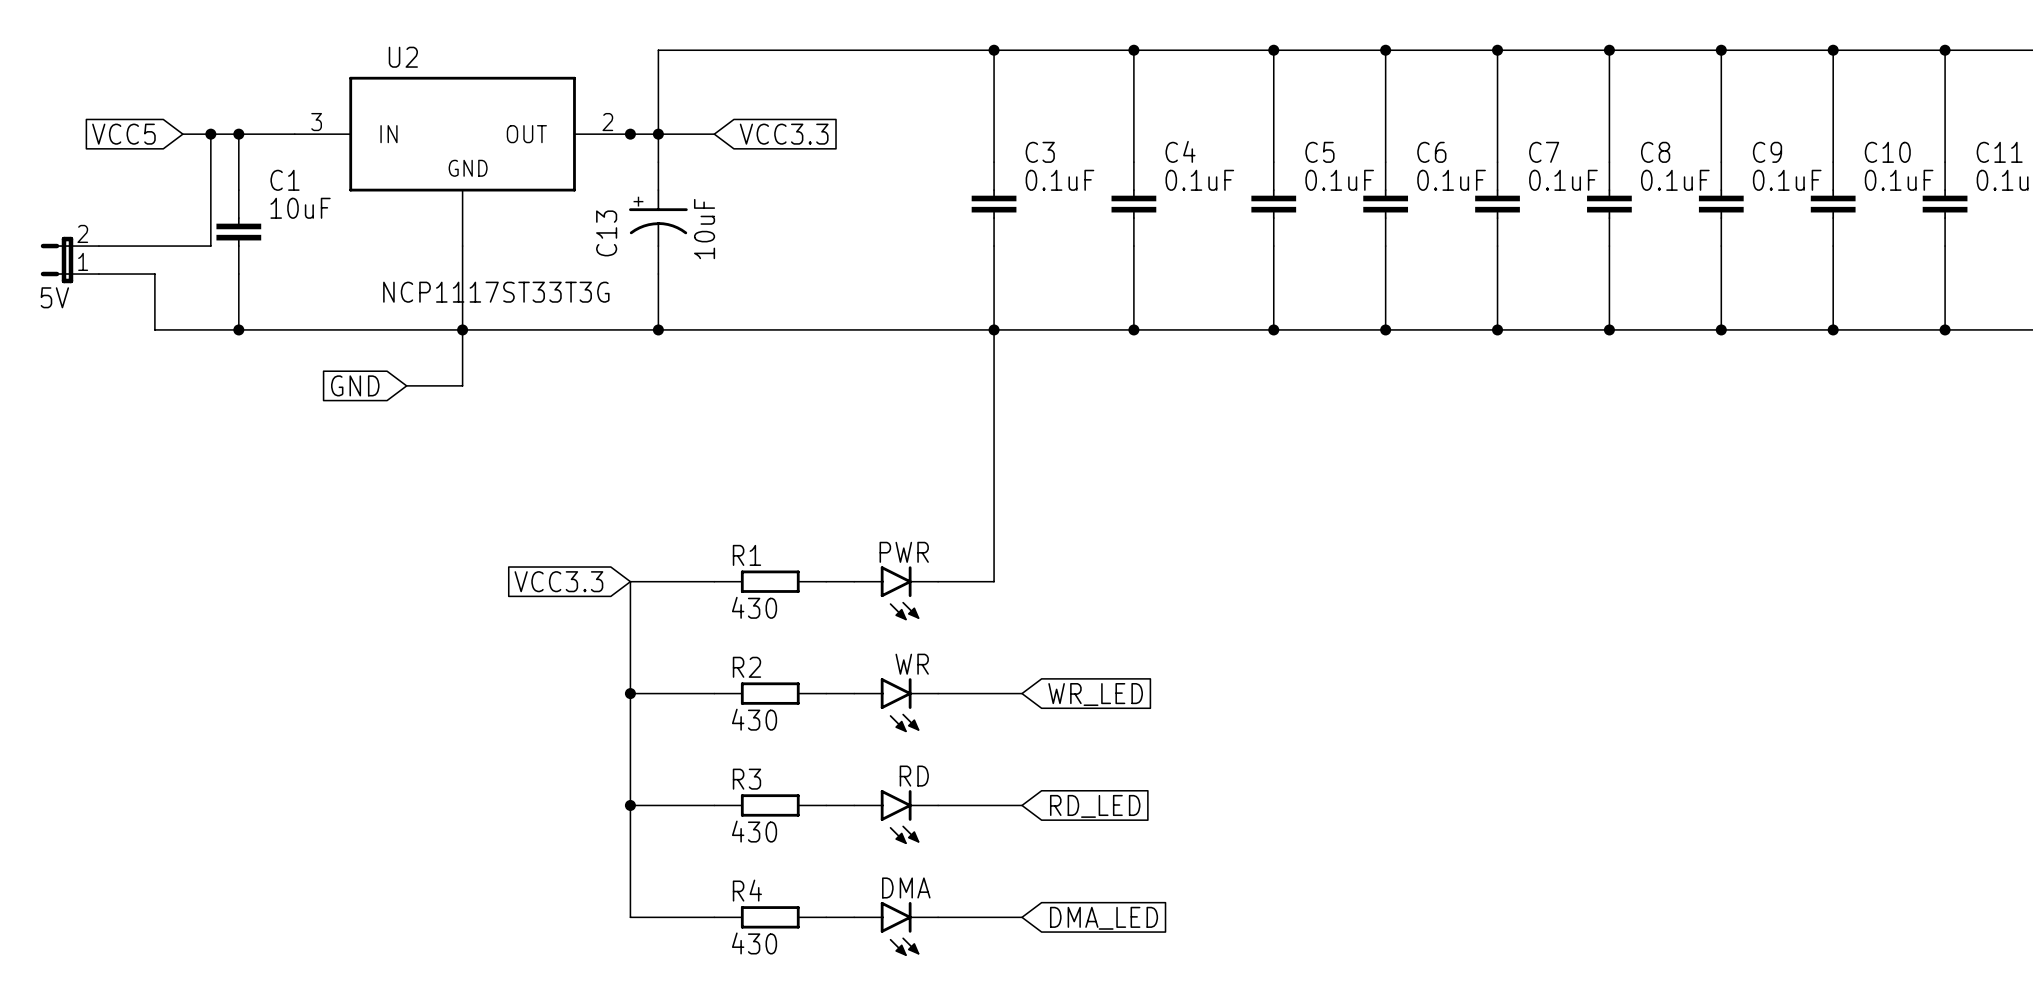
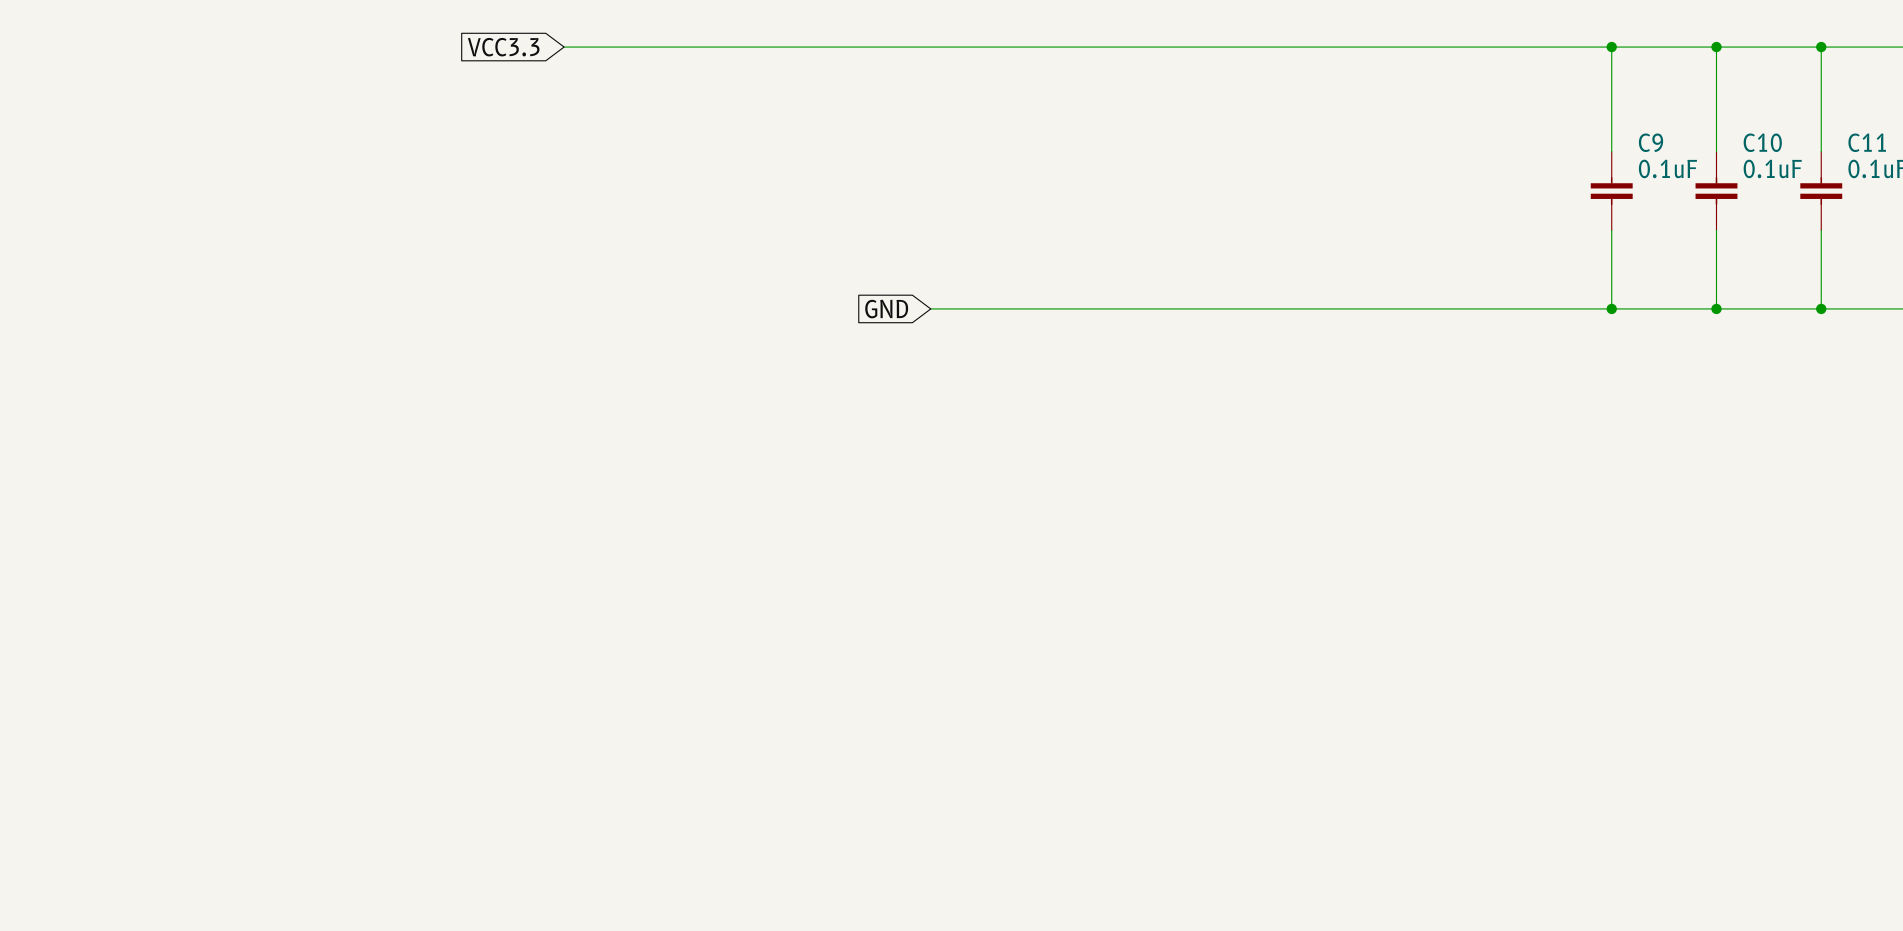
wire: (658, 50) (658, 162) -> (616, 47) (564, 47)
wire: (994, 50) (994, 162) -> none
junction: (994, 50) -> none
wire: (1133, 50) (1133, 162) -> none
junction: (1133, 50) -> none
wire: (1273, 50) (1273, 162) -> none
junction: (1273, 50) -> none
wire: (1385, 50) (1385, 162) -> none
junction: (1385, 50) -> none
wire: (1497, 50) (1497, 162) -> none
junction: (1497, 50) -> none
wire: (1609, 50) (1609, 162) -> none
junction: (1609, 50) -> none
global label: VCC5 (123, 134) -> none
wire: (182, 134) (294, 134) -> none
wire: (210, 134) (210, 246) (98, 246) -> none
junction: (210, 134) -> none
wire: (238, 134) (238, 190) -> none
junction: (238, 134) -> none
wire: (630, 134) (714, 134) -> none
junction: (630, 134) -> none
junction: (658, 134) -> none
global label rotation: 0° (784, 134) -> 180° (503, 47)
global label position: VCC3.3 (784, 134) -> VCC3.3 (503, 47)
U2: NCP1117ST33T3G (462, 161) -> none
C3: 0.1uF (994, 204) -> none
C4: 0.1uF (1133, 204) -> none
C5: 0.1uF (1273, 204) -> none
C6: 0.1uF (1385, 204) -> none
C7: 0.1uF (1497, 204) -> none
C8: 0.1uF (1609, 204) -> none
C13: 10uF (658, 218) -> none
C1: 10uF (238, 232) -> none
wire: (462, 246) (462, 385) (406, 385) -> none
wire: (994, 246) (994, 581) (938, 581) -> none
wire: (1133, 246) (1133, 329) -> none
wire: (1273, 246) (1273, 329) -> none
wire: (1385, 246) (1385, 329) -> none
wire: (1497, 246) (1497, 329) -> none
wire: (1609, 246) (1609, 329) -> none
5V: (69, 260) -> none
wire: (98, 274) (154, 274) (154, 329) (994, 329) -> none
wire: (238, 274) (238, 329) -> none
wire: (658, 274) (658, 329) -> none
junction: (238, 329) -> none
junction: (462, 329) -> none
junction: (658, 329) -> none
global label: none -> GND (886, 309)
junction: (994, 329) -> none
junction: (1133, 329) -> none
junction: (1273, 329) -> none
junction: (1385, 329) -> none
junction: (1497, 329) -> none
junction: (1609, 329) -> none
global label: GND (355, 385) -> none
global label: VCC3.3 (558, 581) -> none
wire: (714, 581) (630, 581) (630, 917) (714, 917) -> none
R1: 430 (770, 581) -> none
wire: (826, 581) (854, 581) -> none
PWR: (896, 593) -> none
wire: (630, 693) (714, 693) -> none
junction: (630, 693) -> none
R2: 430 (770, 693) -> none
wire: (826, 693) (854, 693) -> none
wire: (938, 693) (1022, 693) -> none
global label: WR_LED (1095, 694) -> none
WR: (896, 705) -> none
wire: (630, 805) (714, 805) -> none
junction: (630, 805) -> none
R3: 430 (770, 805) -> none
wire: (826, 805) (854, 805) -> none
wire: (938, 805) (1022, 805) -> none
global label: RD_LED (1095, 806) -> none
RD: (896, 817) -> none
R4: 430 (770, 917) -> none
wire: (826, 917) (854, 917) -> none
wire: (938, 917) (1022, 917) -> none
global label: DMA_LED (1104, 918) -> none
DMA: (896, 928) -> none

